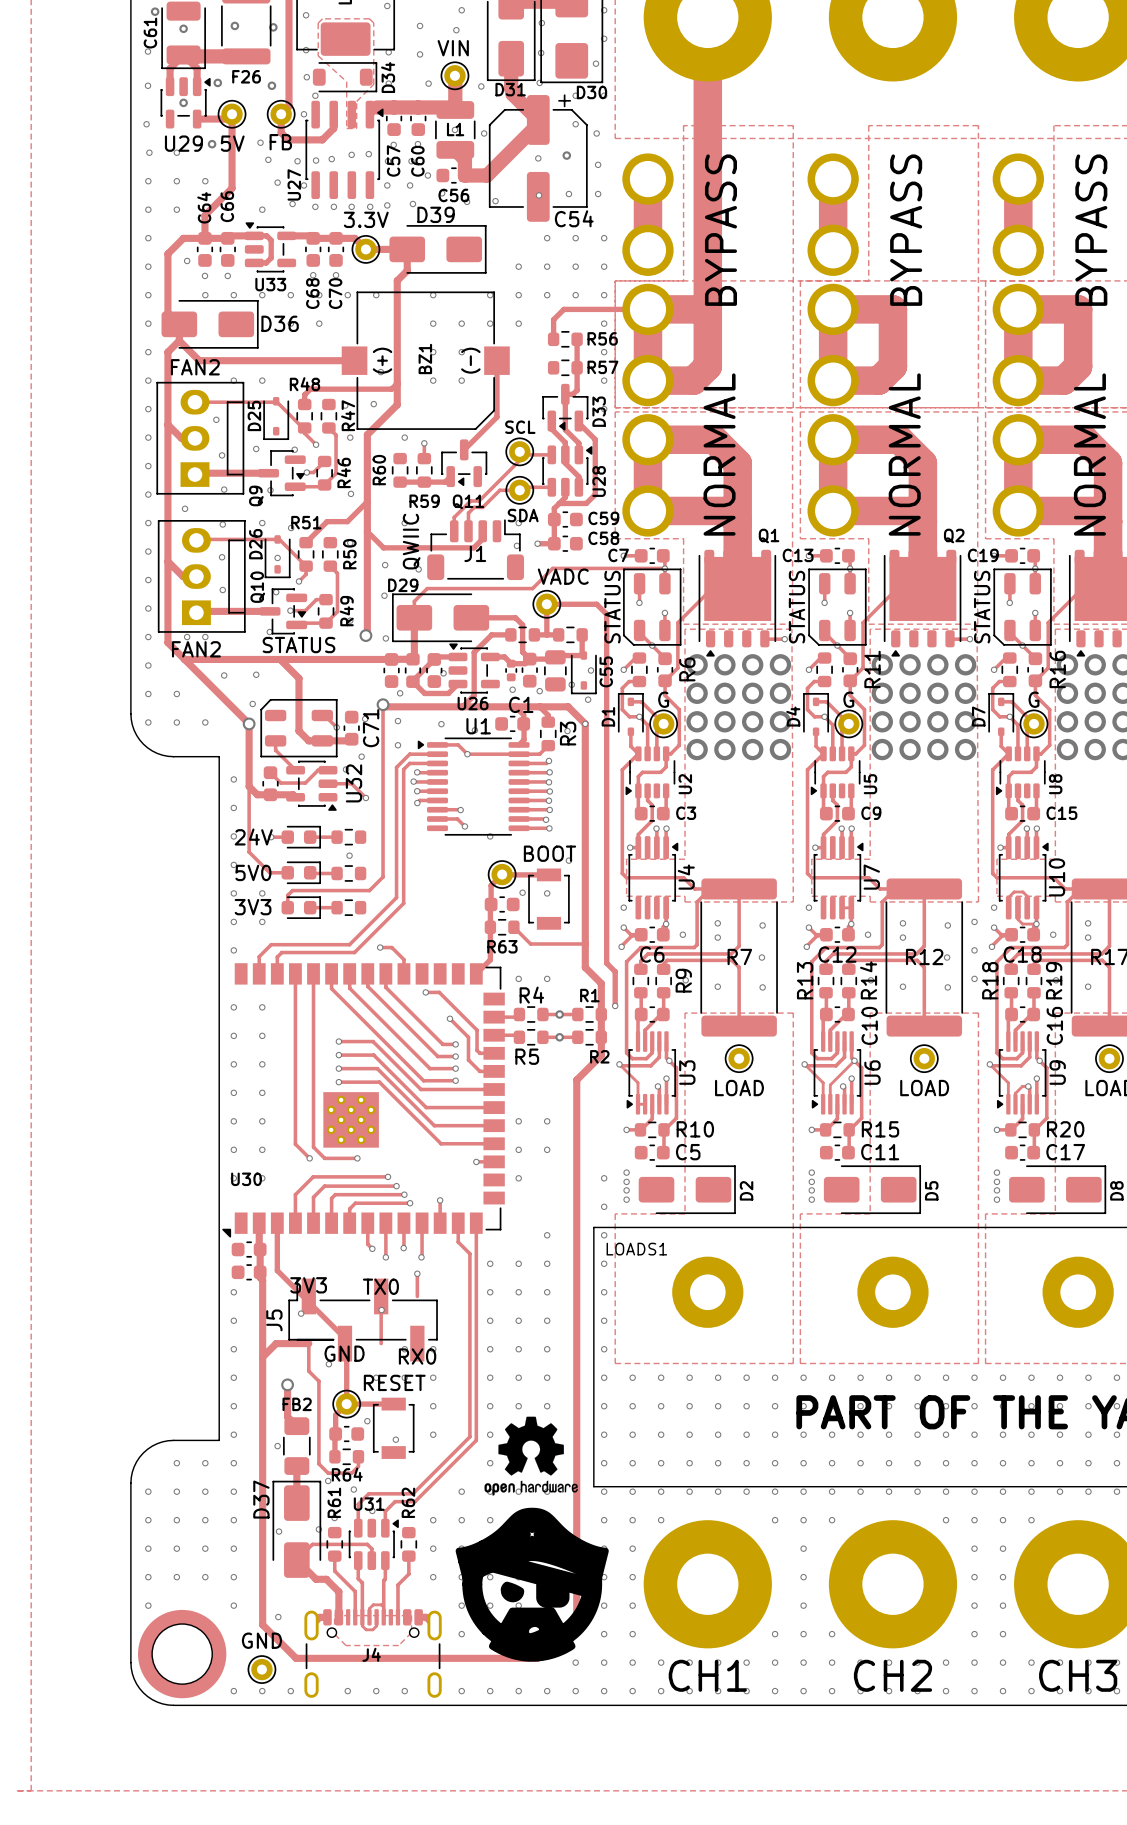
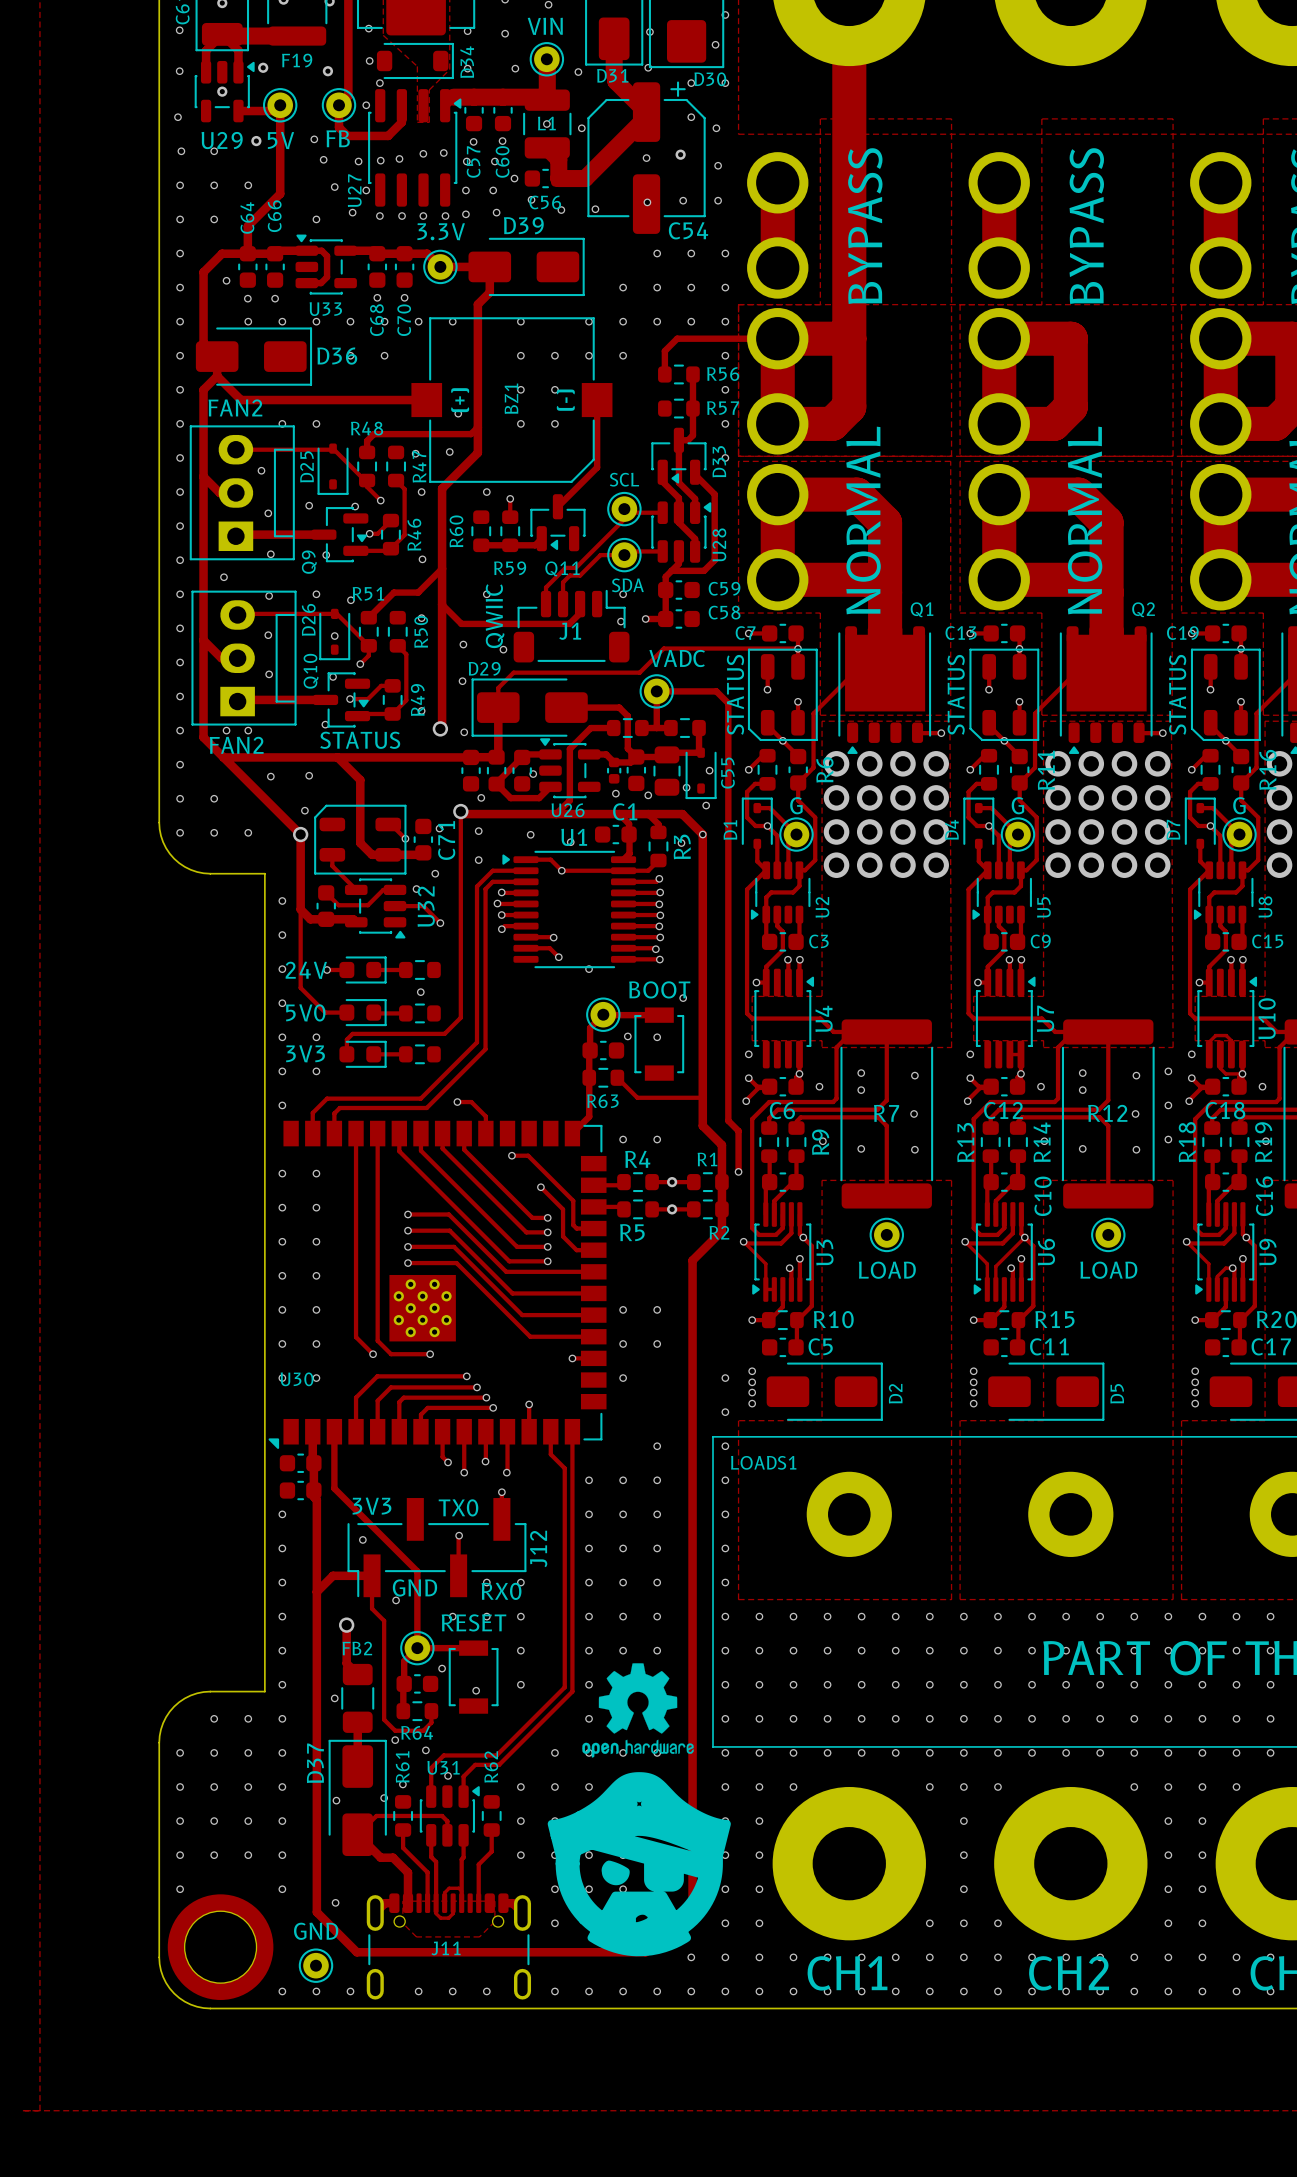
F26 name: F26 (246, 76) -> F19 (297, 60)
J5: (363, 1320) -> none
J12: none -> (436, 1547)
J4 name: J4 (371, 1654) -> J11 (446, 1948)

